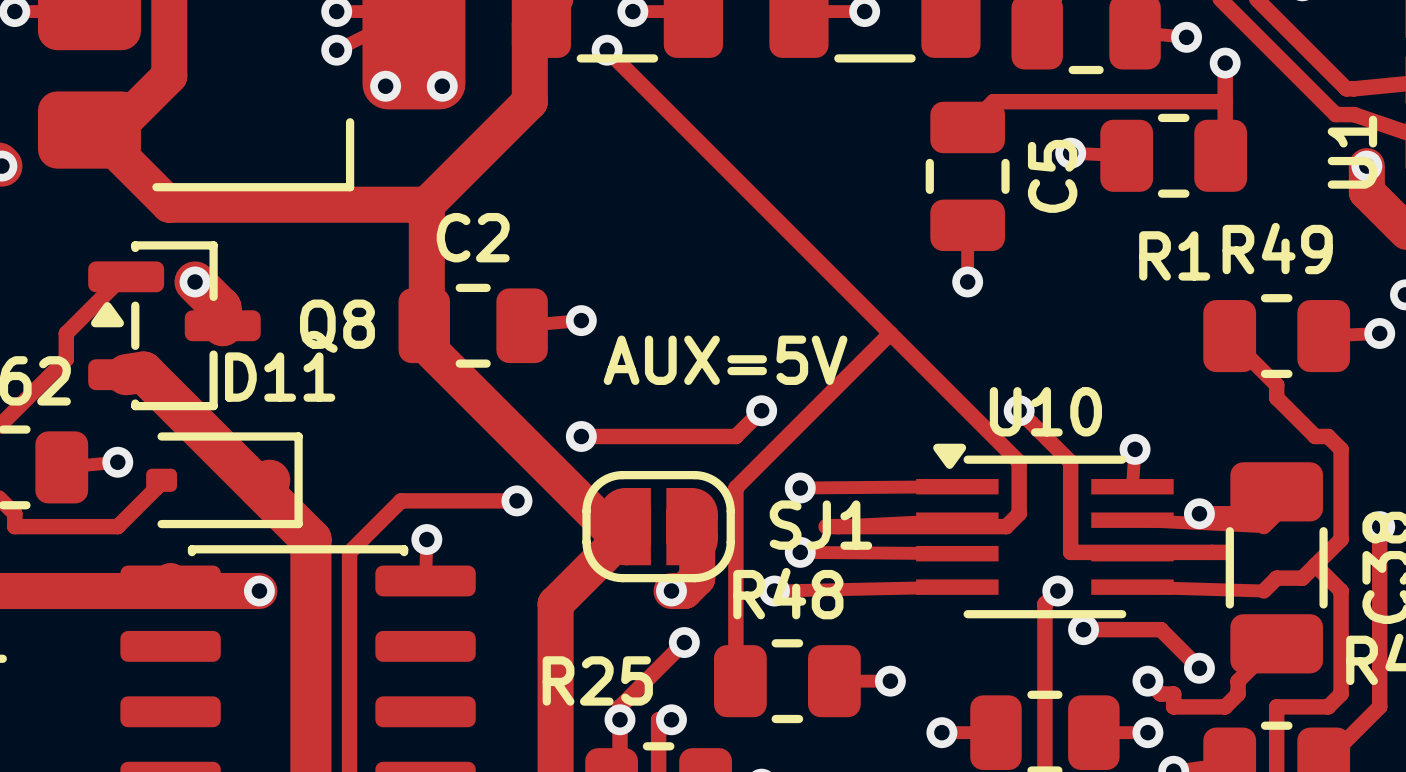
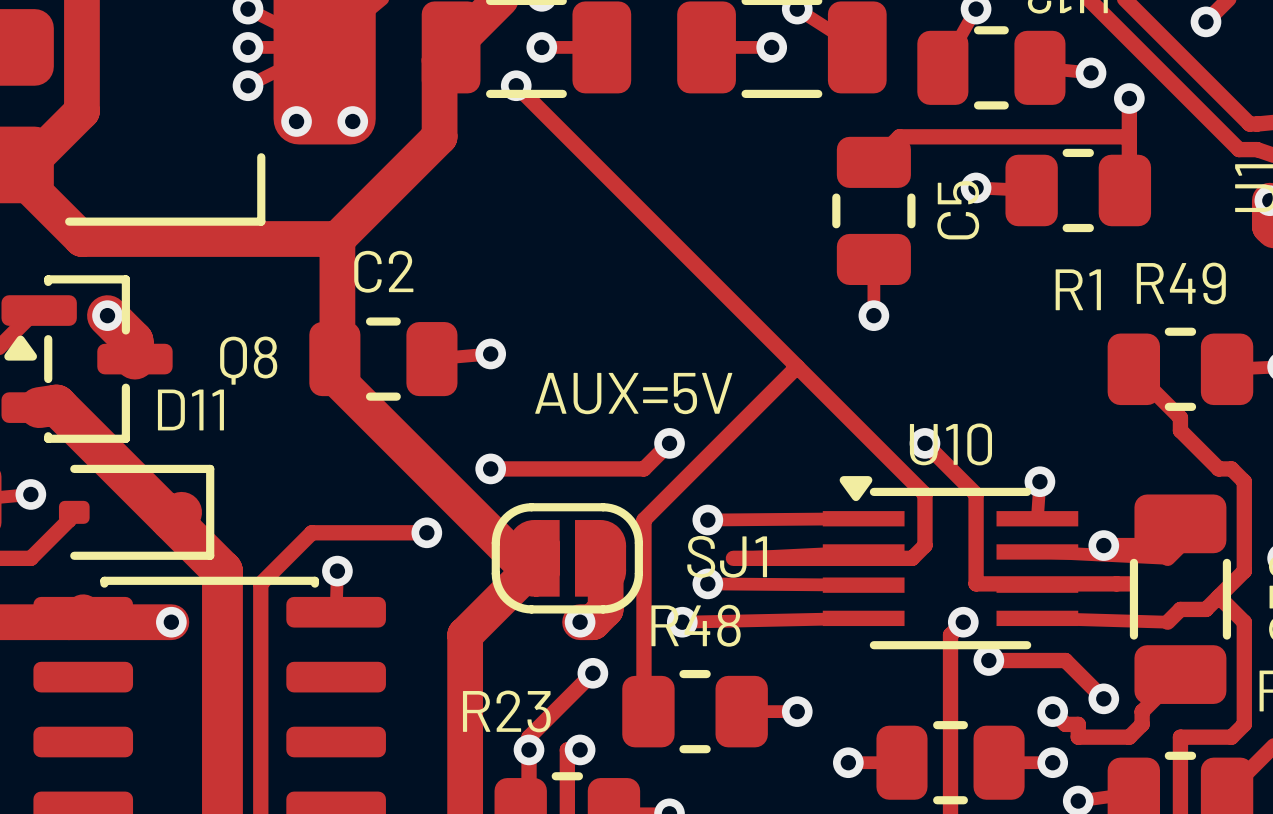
R25 name: R25 (597, 680) -> R23 (506, 711)

